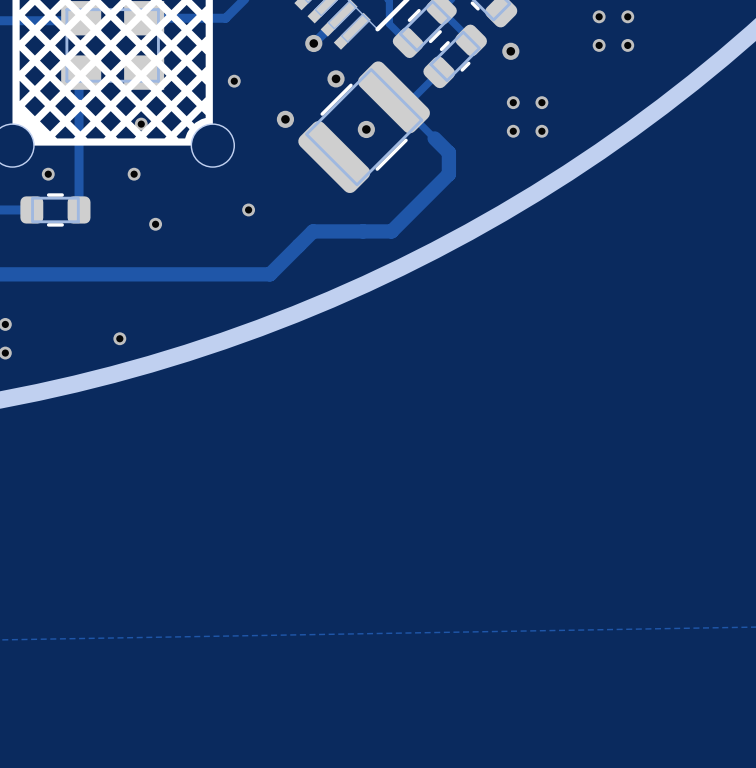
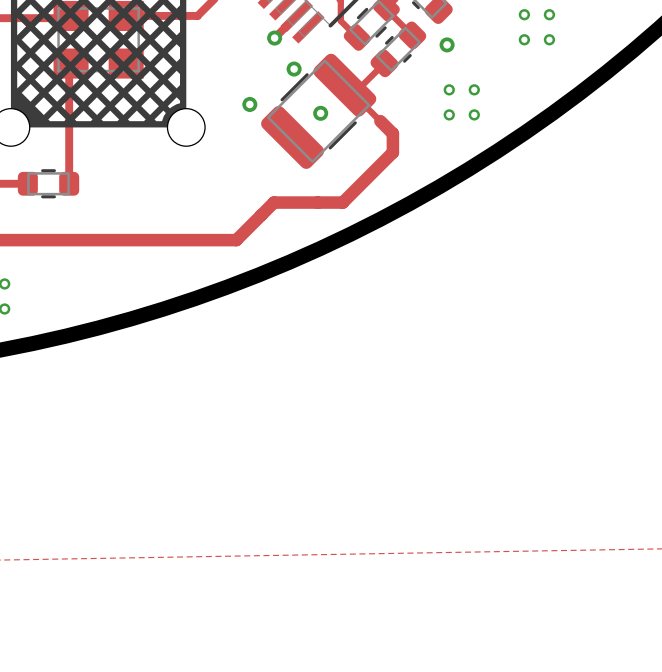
via: (234, 81) -> none
via: (141, 124) -> none
via: (48, 174) -> none
via: (134, 174) -> none
via: (248, 209) -> none
via: (155, 224) -> none
via: (119, 338) -> none

